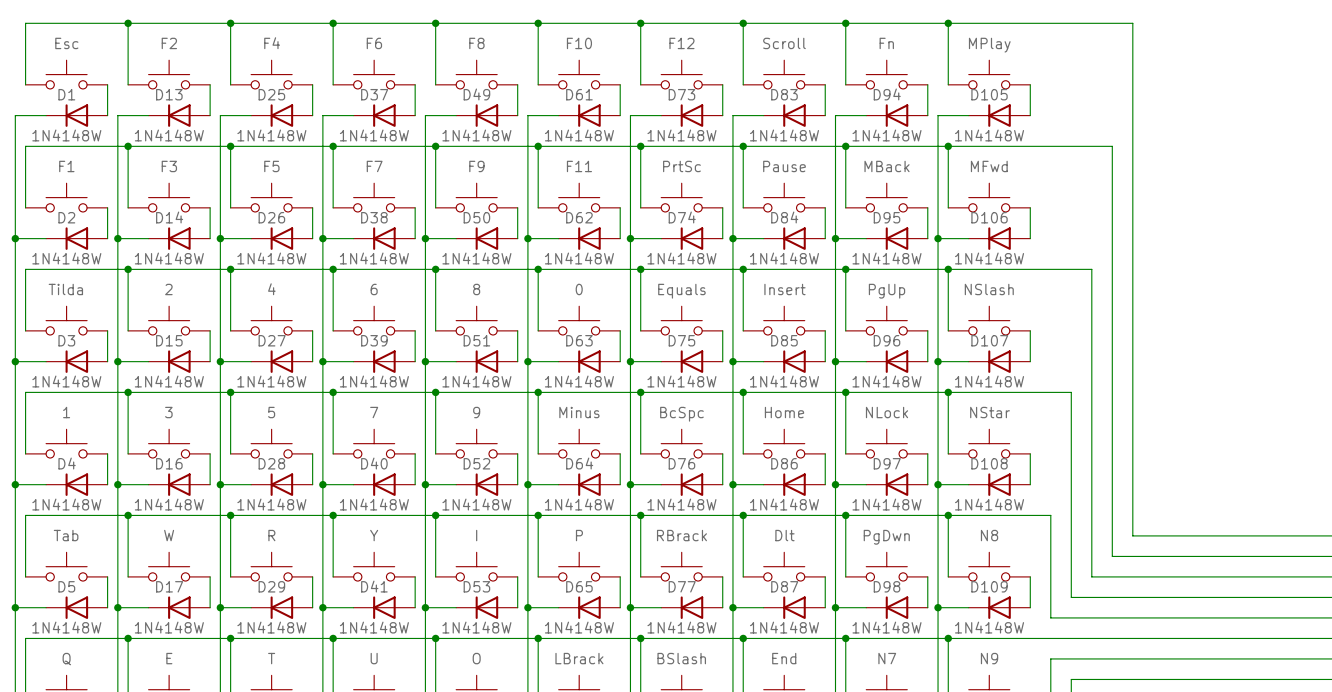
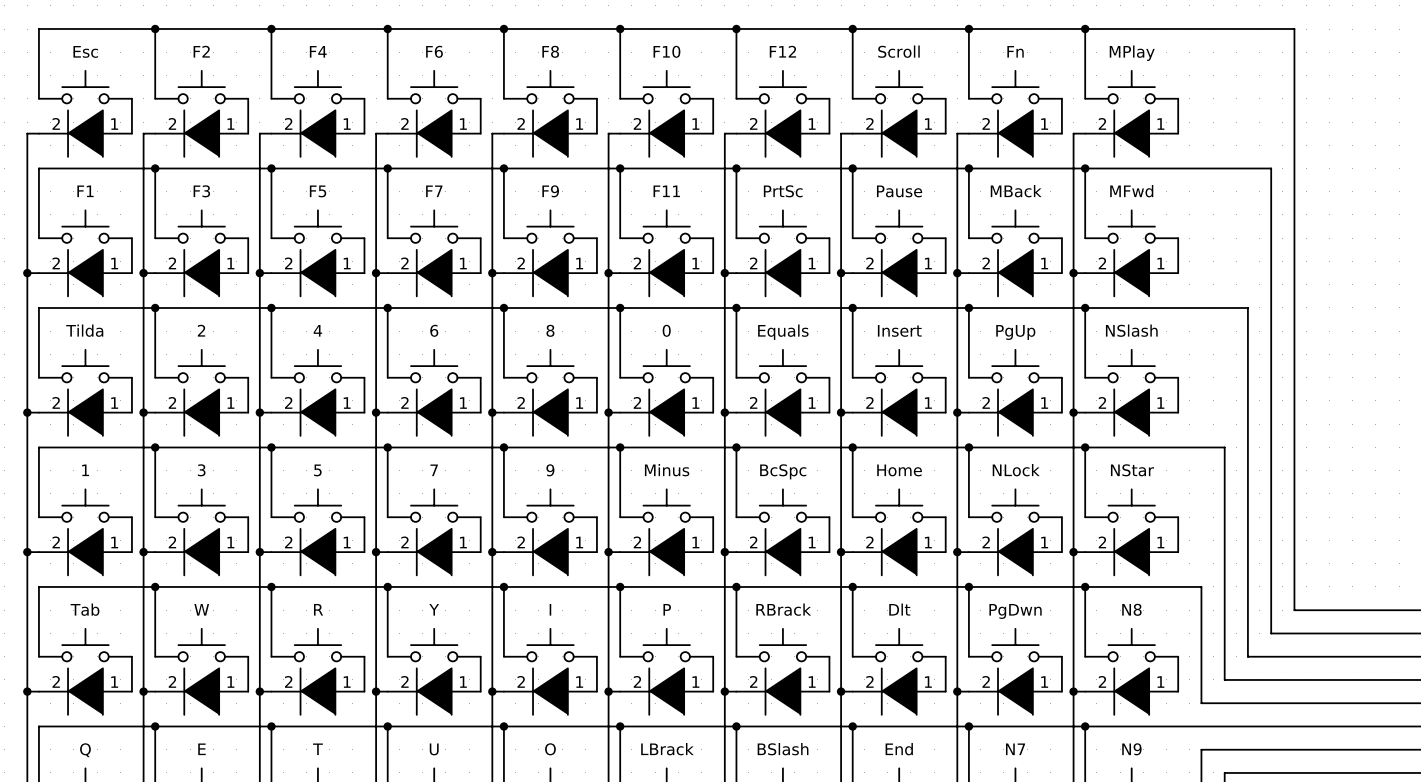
part: none -> (85, 133)
D1: 1N4148W (76, 115) -> none
part: none -> (201, 133)
D13: 1N4148W (179, 115) -> none
part: none -> (317, 133)
D25: 1N4148W (281, 115) -> none
part: none -> (434, 133)
D37: 1N4148W (384, 115) -> none
part: none -> (550, 133)
D49: 1N4148W (486, 115) -> none
part: none -> (666, 133)
D61: 1N4148W (589, 115) -> none
part: none -> (782, 133)
D73: 1N4148W (691, 115) -> none
part: none -> (899, 133)
D83: 1N4148W (794, 115) -> none
part: none -> (1015, 133)
D94: 1N4148W (897, 115) -> none
part: none -> (1131, 133)
D105: 1N4148W (999, 115) -> none
part: none -> (85, 273)
D2: 1N4148W (76, 238) -> none
part: none -> (201, 273)
D14: 1N4148W (179, 238) -> none
part: none -> (317, 273)
D26: 1N4148W (281, 238) -> none
part: none -> (434, 273)
D38: 1N4148W (384, 238) -> none
part: none -> (550, 273)
D50: 1N4148W (486, 238) -> none
part: none -> (666, 273)
D62: 1N4148W (589, 238) -> none
part: none -> (782, 273)
D74: 1N4148W (691, 238) -> none
part: none -> (899, 273)
D84: 1N4148W (794, 238) -> none
part: none -> (1015, 273)
D95: 1N4148W (897, 238) -> none
part: none -> (1131, 273)
D106: 1N4148W (999, 238) -> none
part: none -> (85, 412)
D3: 1N4148W (76, 361) -> none
part: none -> (201, 412)
D15: 1N4148W (179, 361) -> none
part: none -> (317, 412)
D27: 1N4148W (281, 361) -> none
part: none -> (434, 412)
D39: 1N4148W (384, 361) -> none
part: none -> (550, 412)
D51: 1N4148W (486, 361) -> none
part: none -> (666, 412)
D63: 1N4148W (589, 361) -> none
part: none -> (782, 412)
D75: 1N4148W (691, 361) -> none
part: none -> (899, 412)
D85: 1N4148W (794, 361) -> none
part: none -> (1015, 412)
D96: 1N4148W (897, 361) -> none
part: none -> (1131, 412)
D107: 1N4148W (999, 361) -> none
part: none -> (85, 552)
D4: 1N4148W (76, 484) -> none
part: none -> (201, 552)
D16: 1N4148W (179, 484) -> none
part: none -> (317, 552)
D28: 1N4148W (281, 484) -> none
part: none -> (434, 552)
D40: 1N4148W (384, 484) -> none
part: none -> (550, 552)
D52: 1N4148W (486, 484) -> none
part: none -> (666, 552)
D64: 1N4148W (589, 484) -> none
part: none -> (782, 552)
D76: 1N4148W (691, 484) -> none
part: none -> (899, 552)
D86: 1N4148W (794, 484) -> none
part: none -> (1015, 552)
D97: 1N4148W (897, 484) -> none
part: none -> (1131, 552)
D108: 1N4148W (999, 484) -> none
part: none -> (85, 691)
D5: 1N4148W (76, 607) -> none
part: none -> (201, 691)
D17: 1N4148W (179, 607) -> none
part: none -> (317, 691)
D29: 1N4148W (281, 607) -> none
part: none -> (434, 691)
D41: 1N4148W (384, 607) -> none
part: none -> (550, 691)
D53: 1N4148W (486, 607) -> none
part: none -> (666, 691)
D65: 1N4148W (589, 607) -> none
part: none -> (782, 691)
D77: 1N4148W (691, 607) -> none
part: none -> (899, 691)
D87: 1N4148W (794, 607) -> none
part: none -> (1015, 691)
D98: 1N4148W (897, 607) -> none
part: none -> (1131, 691)
D109: 1N4148W (999, 607) -> none

